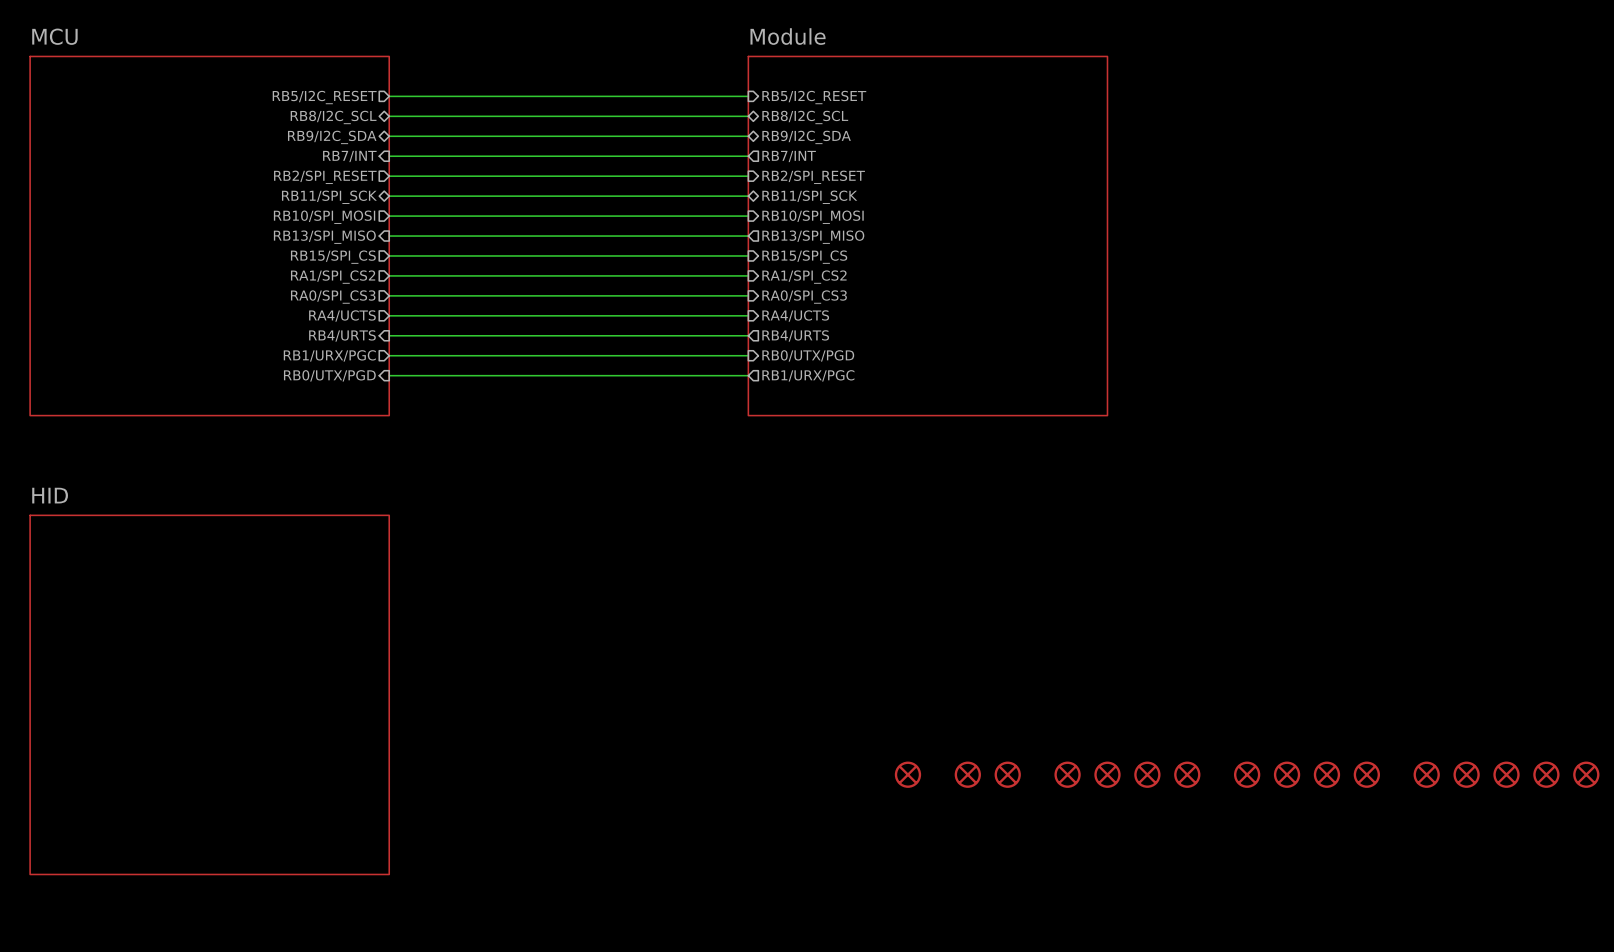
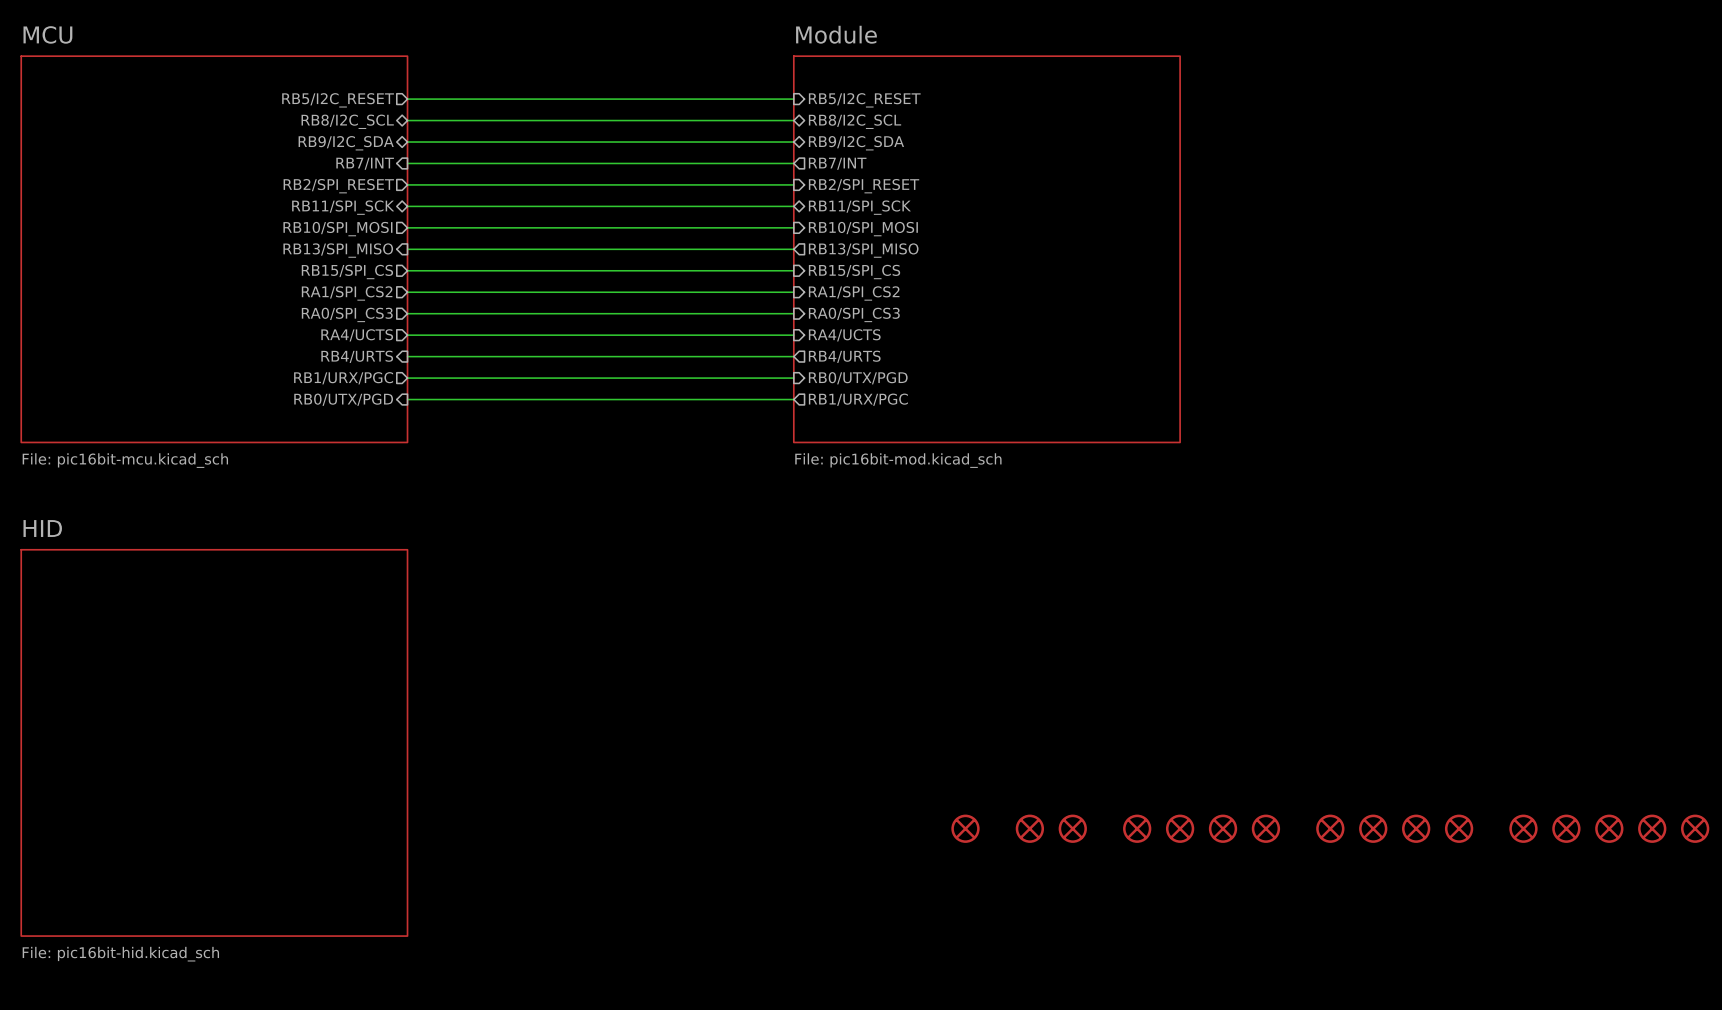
sheet MCU value: none -> File: pic16bit-mcu.kicad_sch (125, 460)
sheet Module value: none -> File: pic16bit-mod.kicad_sch (898, 460)
sheet HID value: none -> File: pic16bit-hid.kicad_sch (120, 954)

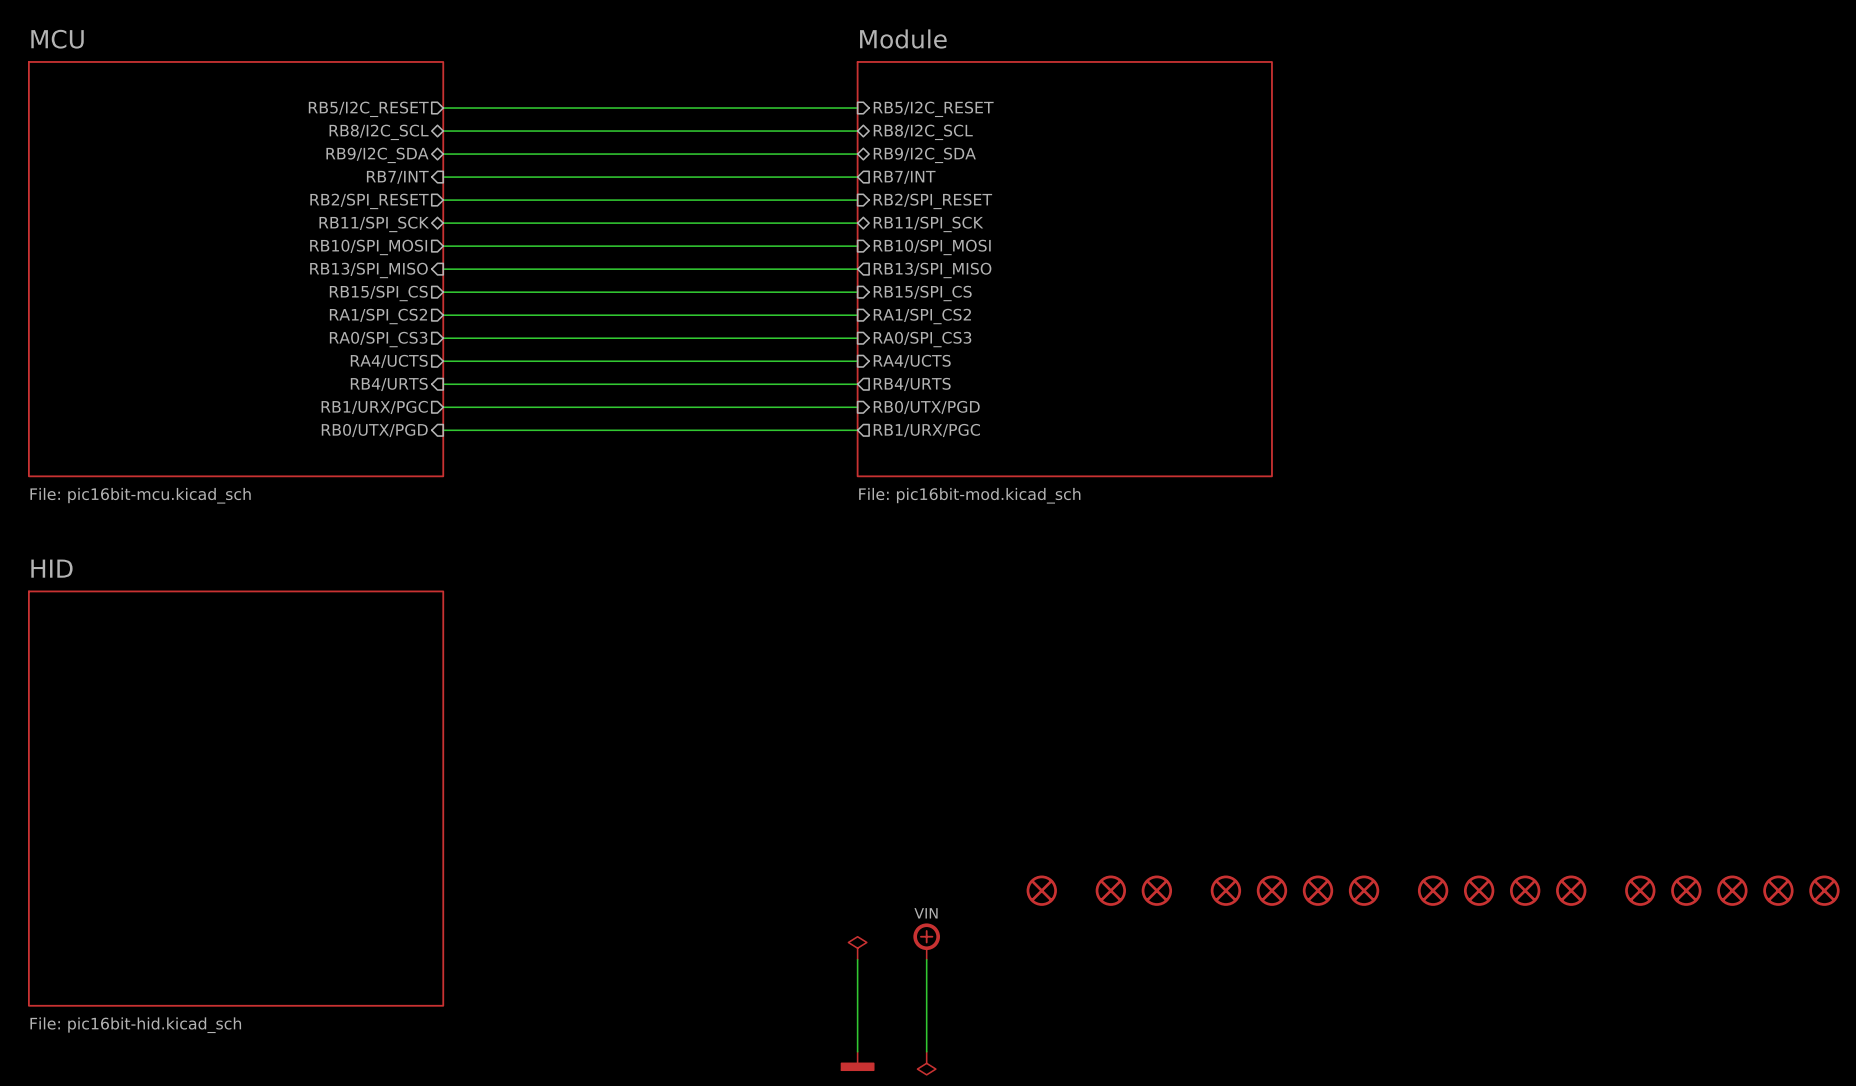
power symbol: none -> (926, 941)
power symbol: none -> (857, 948)
wire: none -> (857, 959) (857, 1051)
wire: none -> (926, 959) (926, 1051)
power symbol: none -> (857, 1061)
power symbol: none -> (926, 1063)

